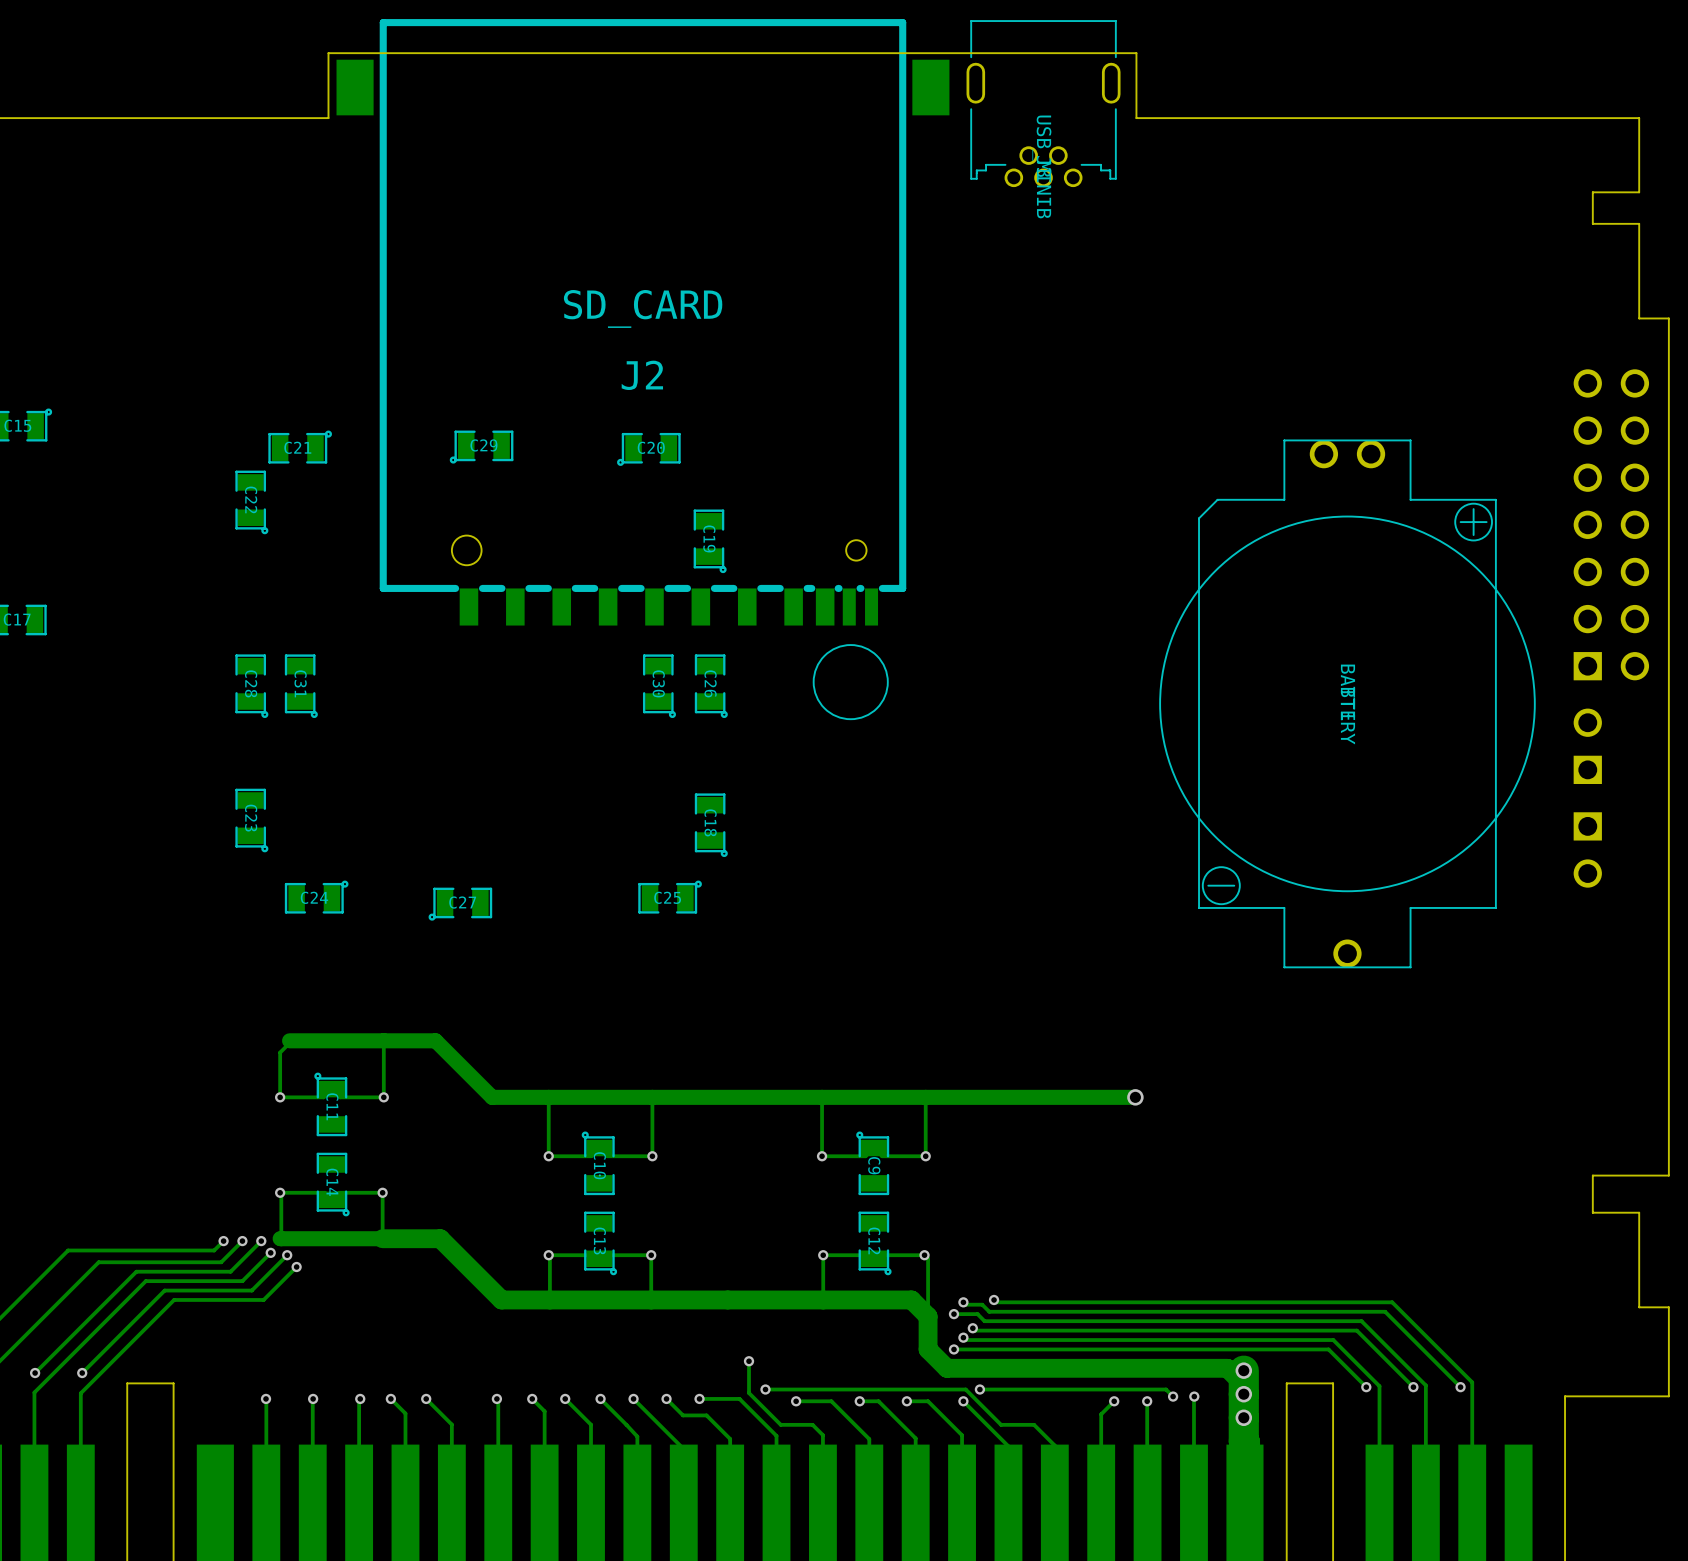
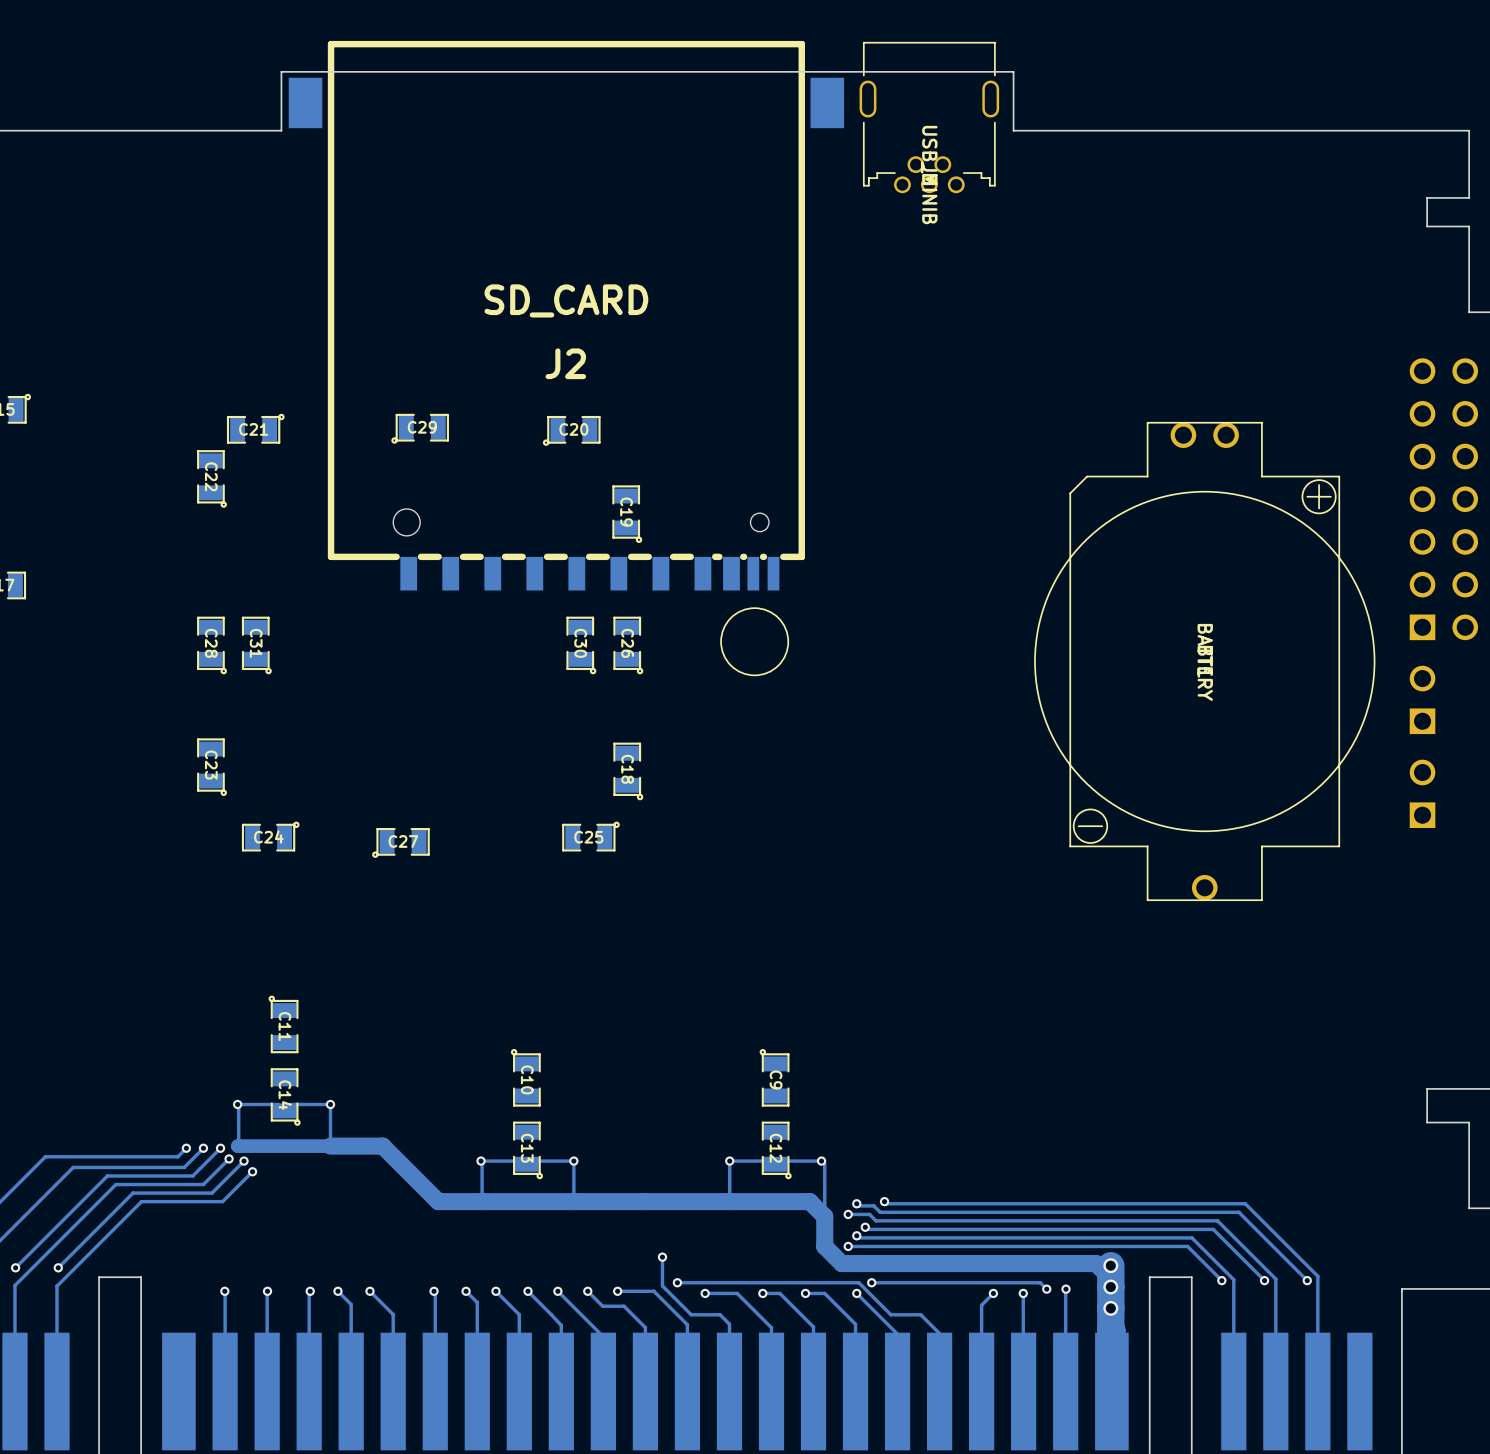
part rotation: 0° (1587, 849) -> 180° (1422, 793)
track: (383, 1040) (383, 1097) (340, 1097) (331, 1089) (323, 1097) (280, 1097) (280, 1052) (289, 1040) (435, 1040) (492, 1097) (1135, 1097) -> none
via: (280, 1097) -> none
via: (383, 1097) -> none
track: (652, 1097) (652, 1156) (607, 1156) (599, 1148) (591, 1156) (548, 1156) (548, 1097) -> none
track: (925, 1097) (925, 1156) (882, 1156) (873, 1148) (865, 1156) (822, 1156) (822, 1097) -> none
via: (1135, 1097) -> none
via: (548, 1156) -> none
via: (652, 1156) -> none
via: (822, 1156) -> none
via: (925, 1156) -> none

